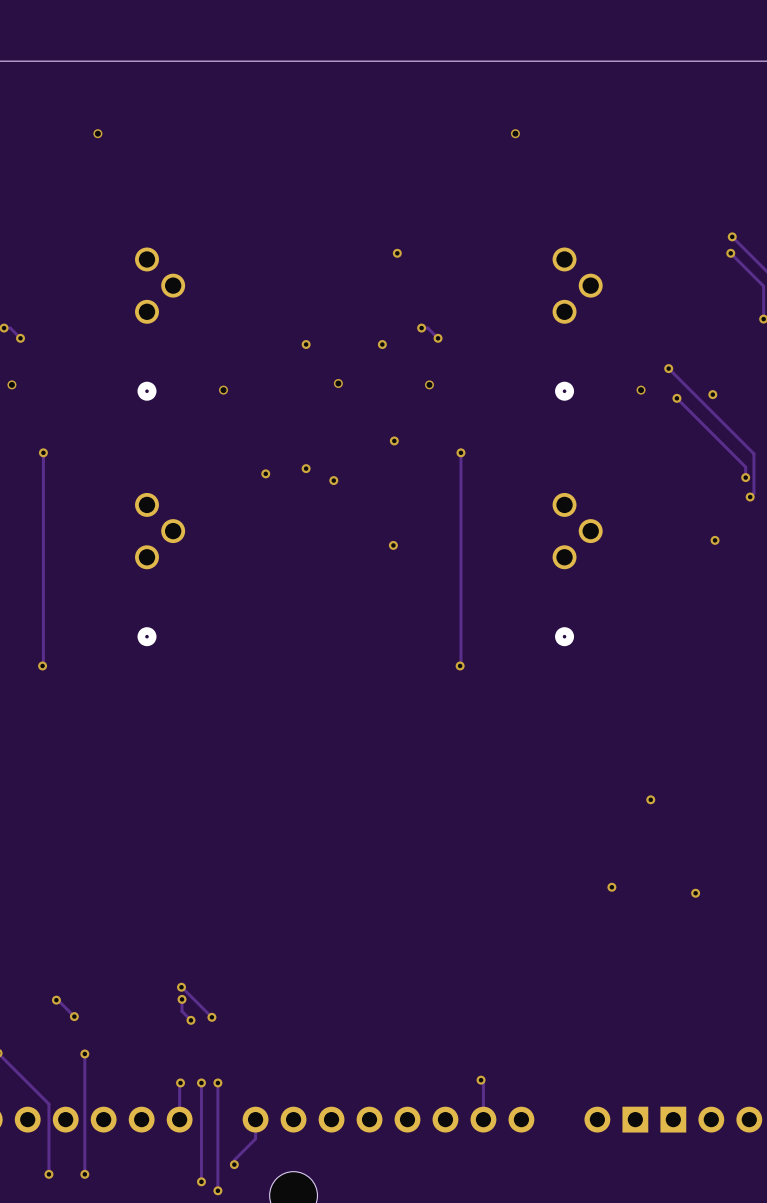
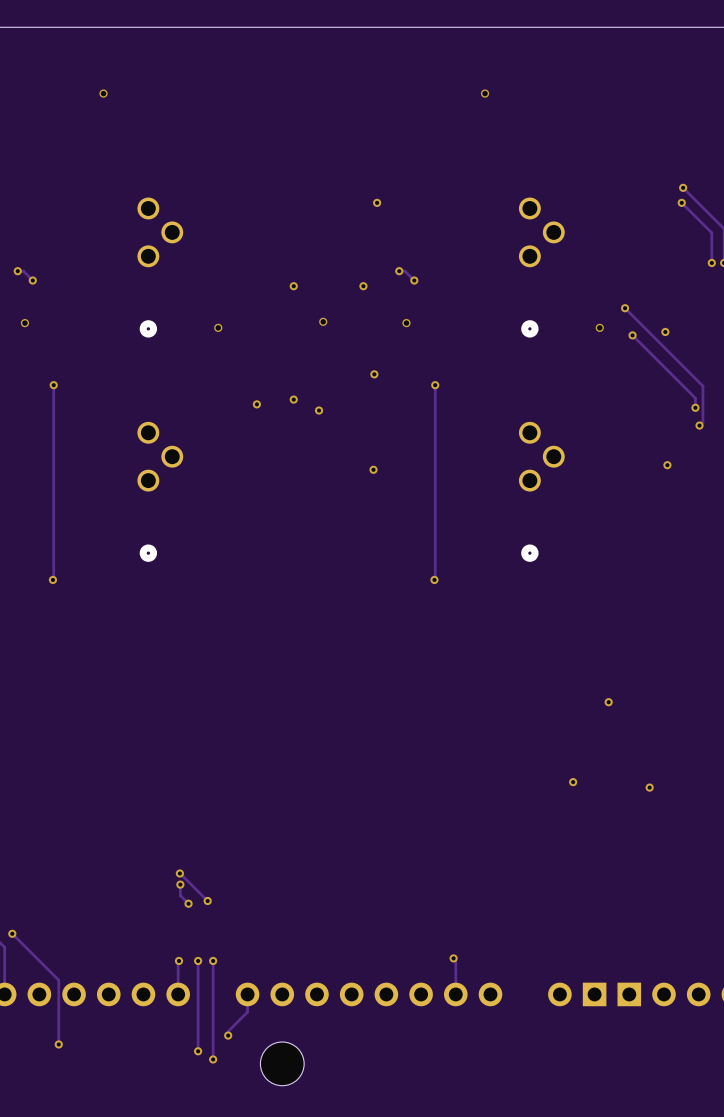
track: (56, 1000) (74, 1016) -> none
via: (56, 1000) -> none
via: (74, 1016) -> none
track: (84, 1053) (84, 1174) -> none
via: (84, 1053) -> none
via: (84, 1174) -> none

